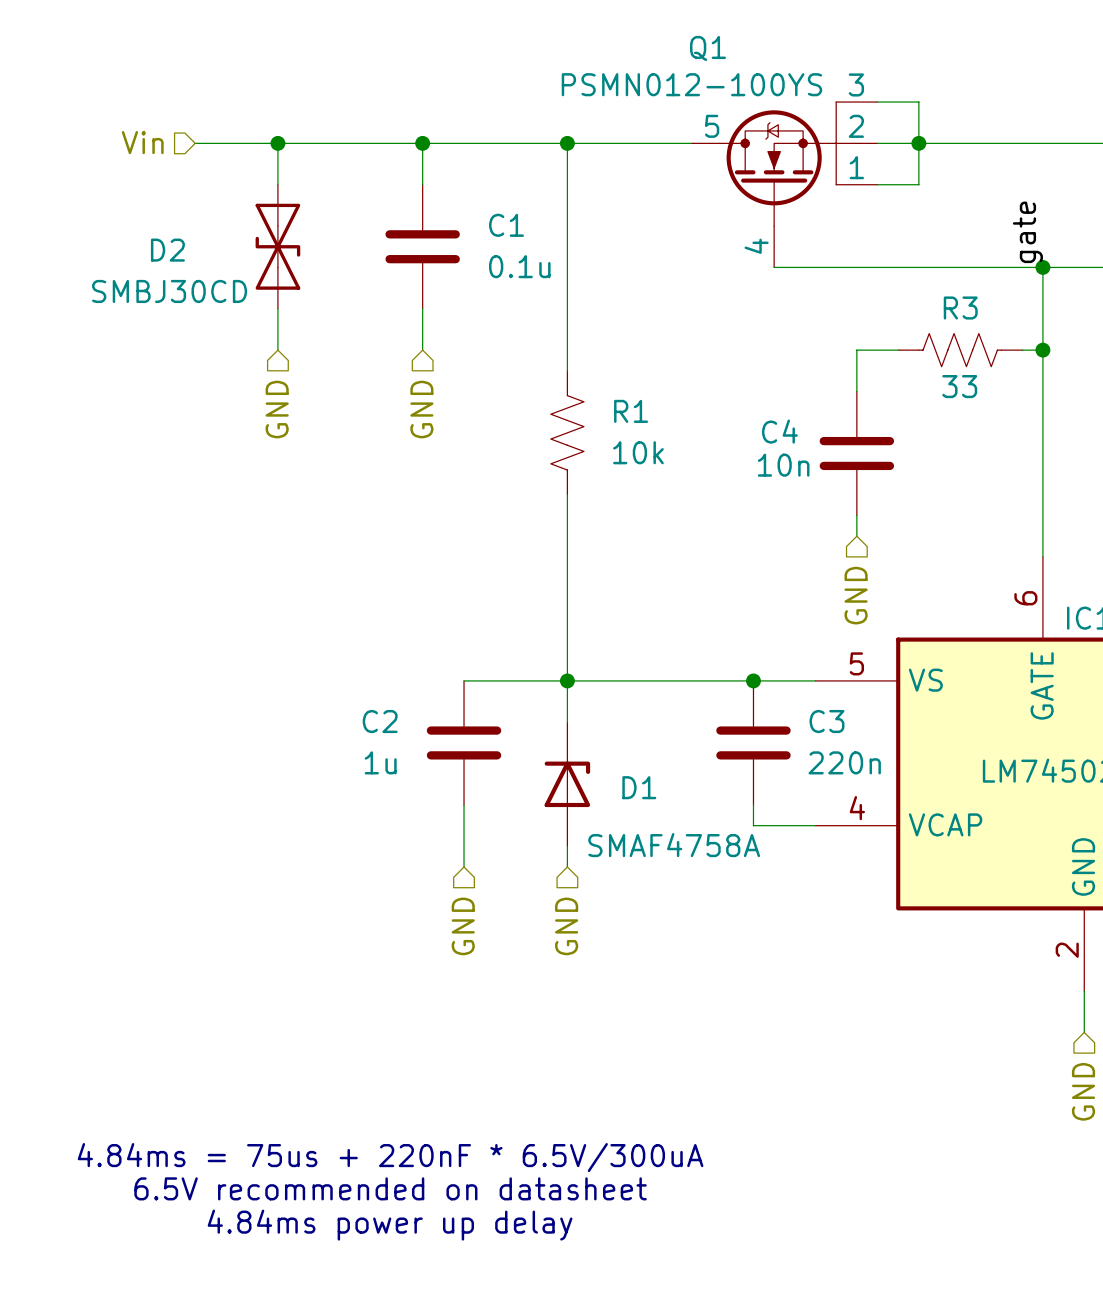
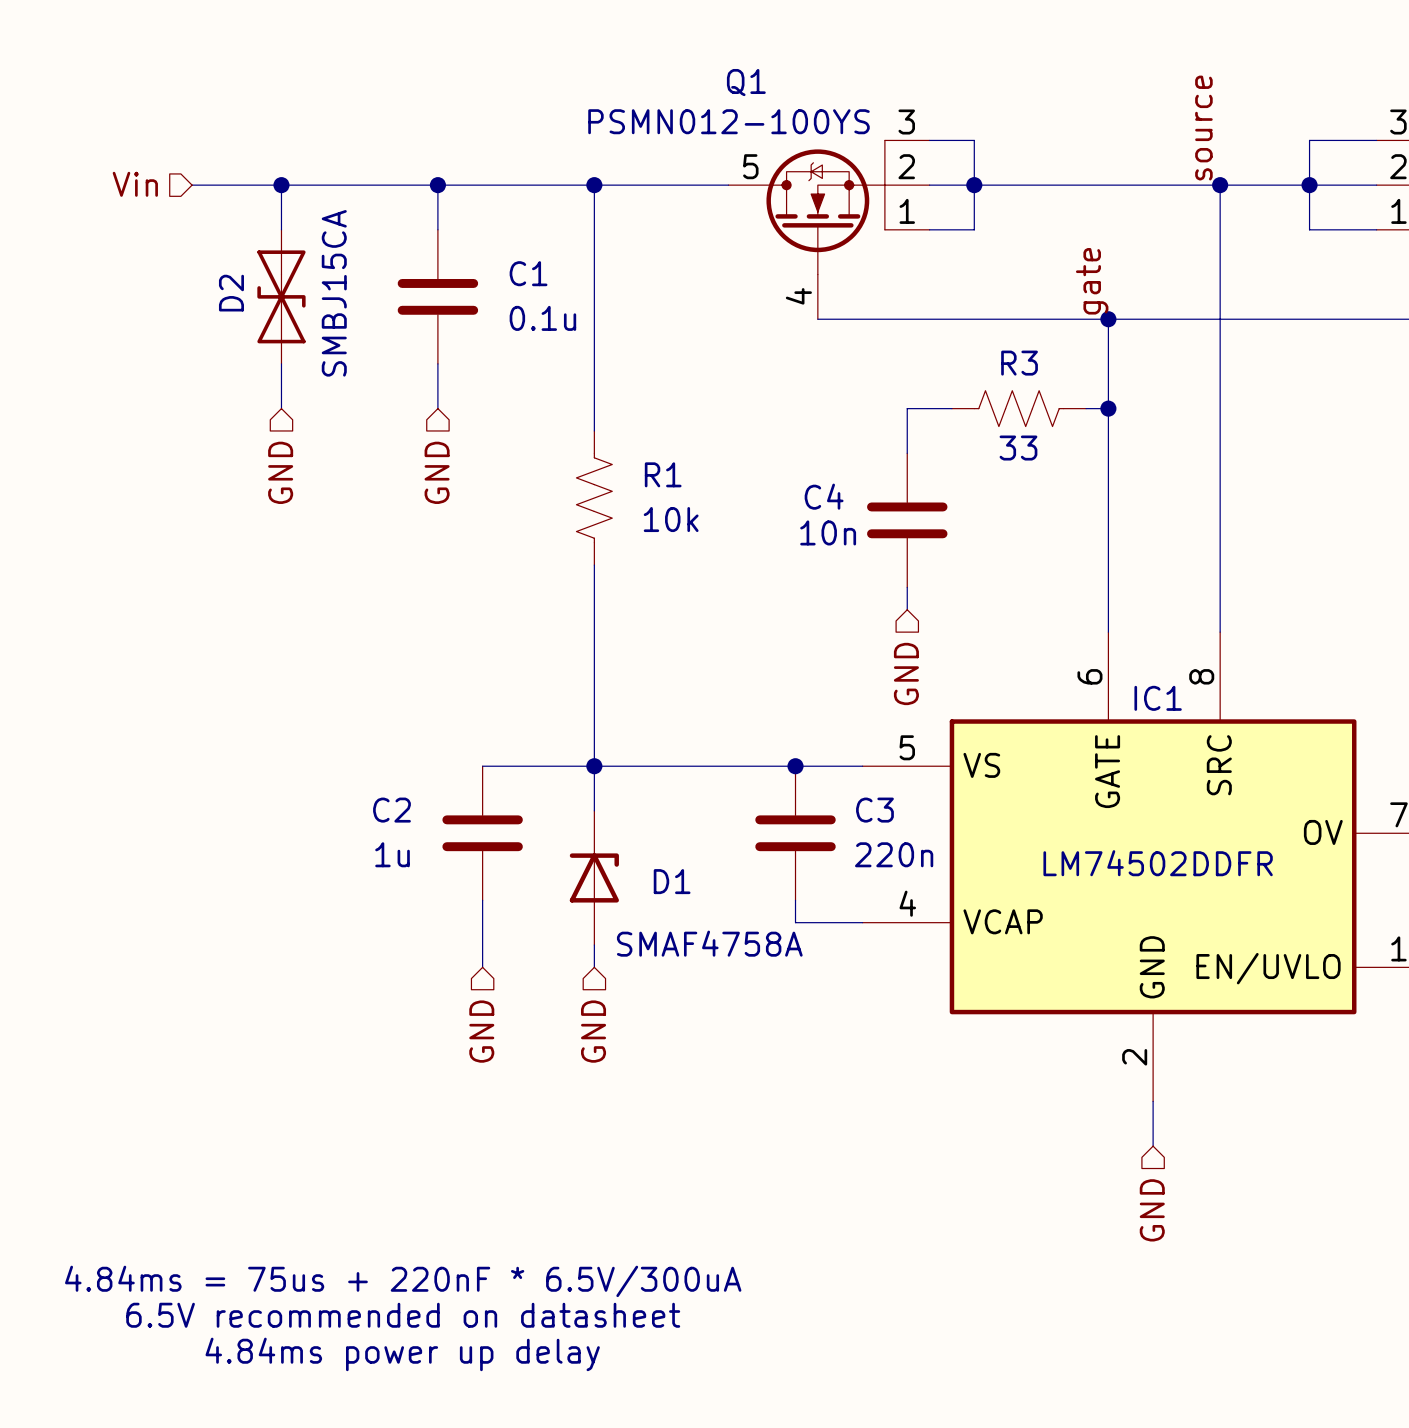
D2 name rotation: 0° (167, 250) -> 90° counterclockwise (231, 293)
D2 name position: D2 (167, 250) -> D2 (231, 293)
D2 value: SMBJ30CD (169, 291) -> SMBJ15CA (334, 293)

